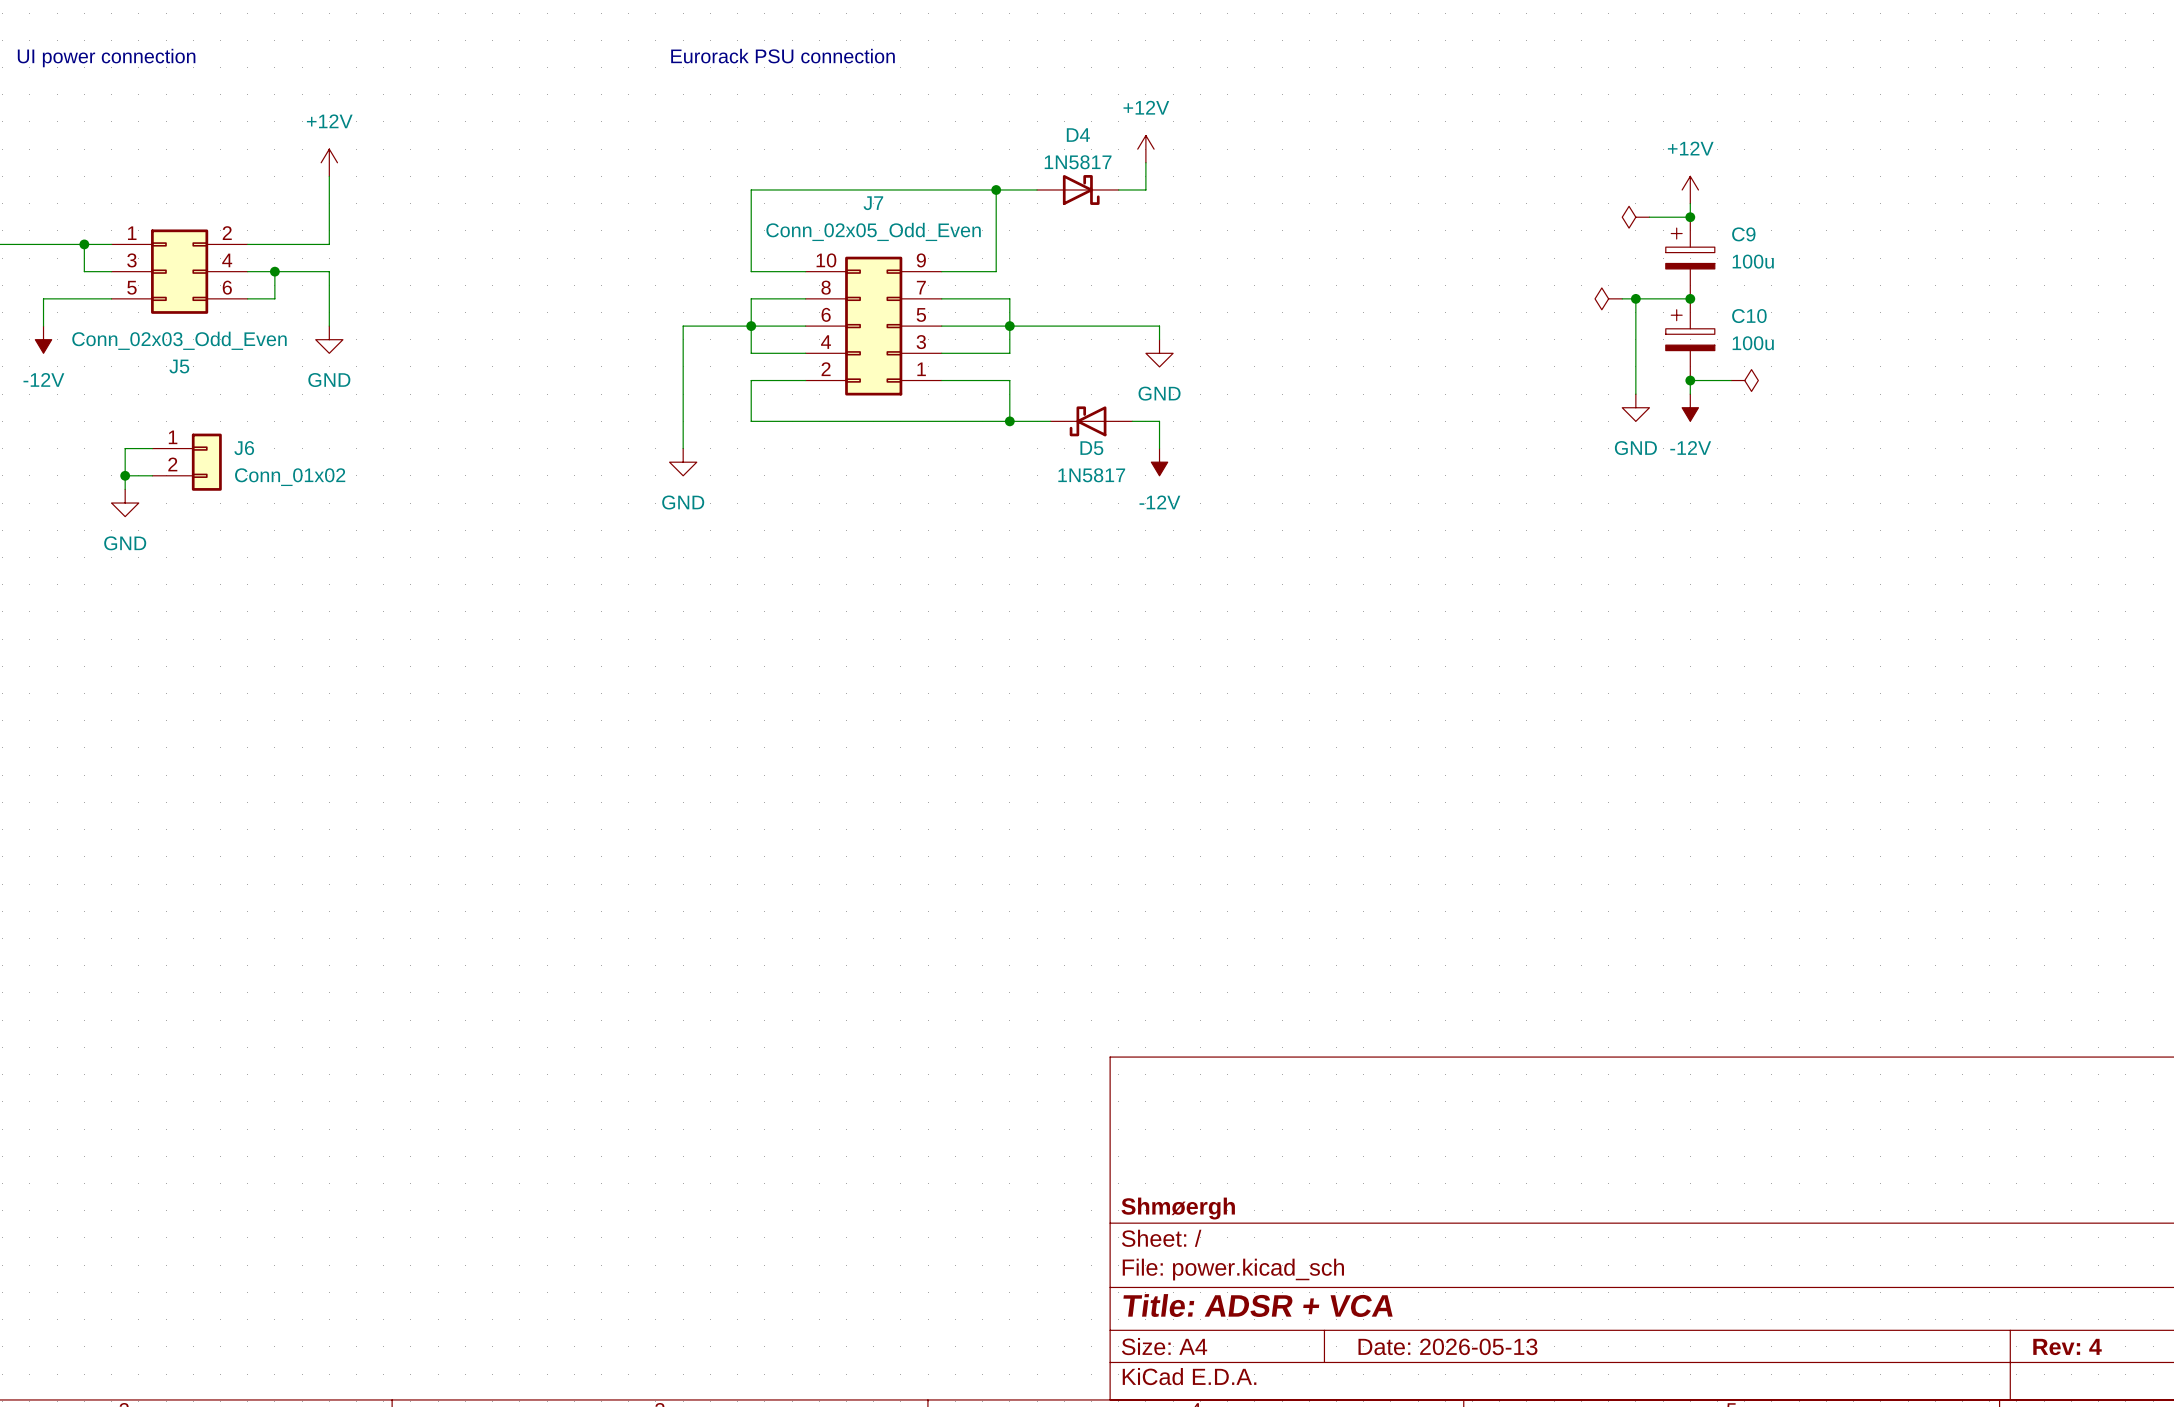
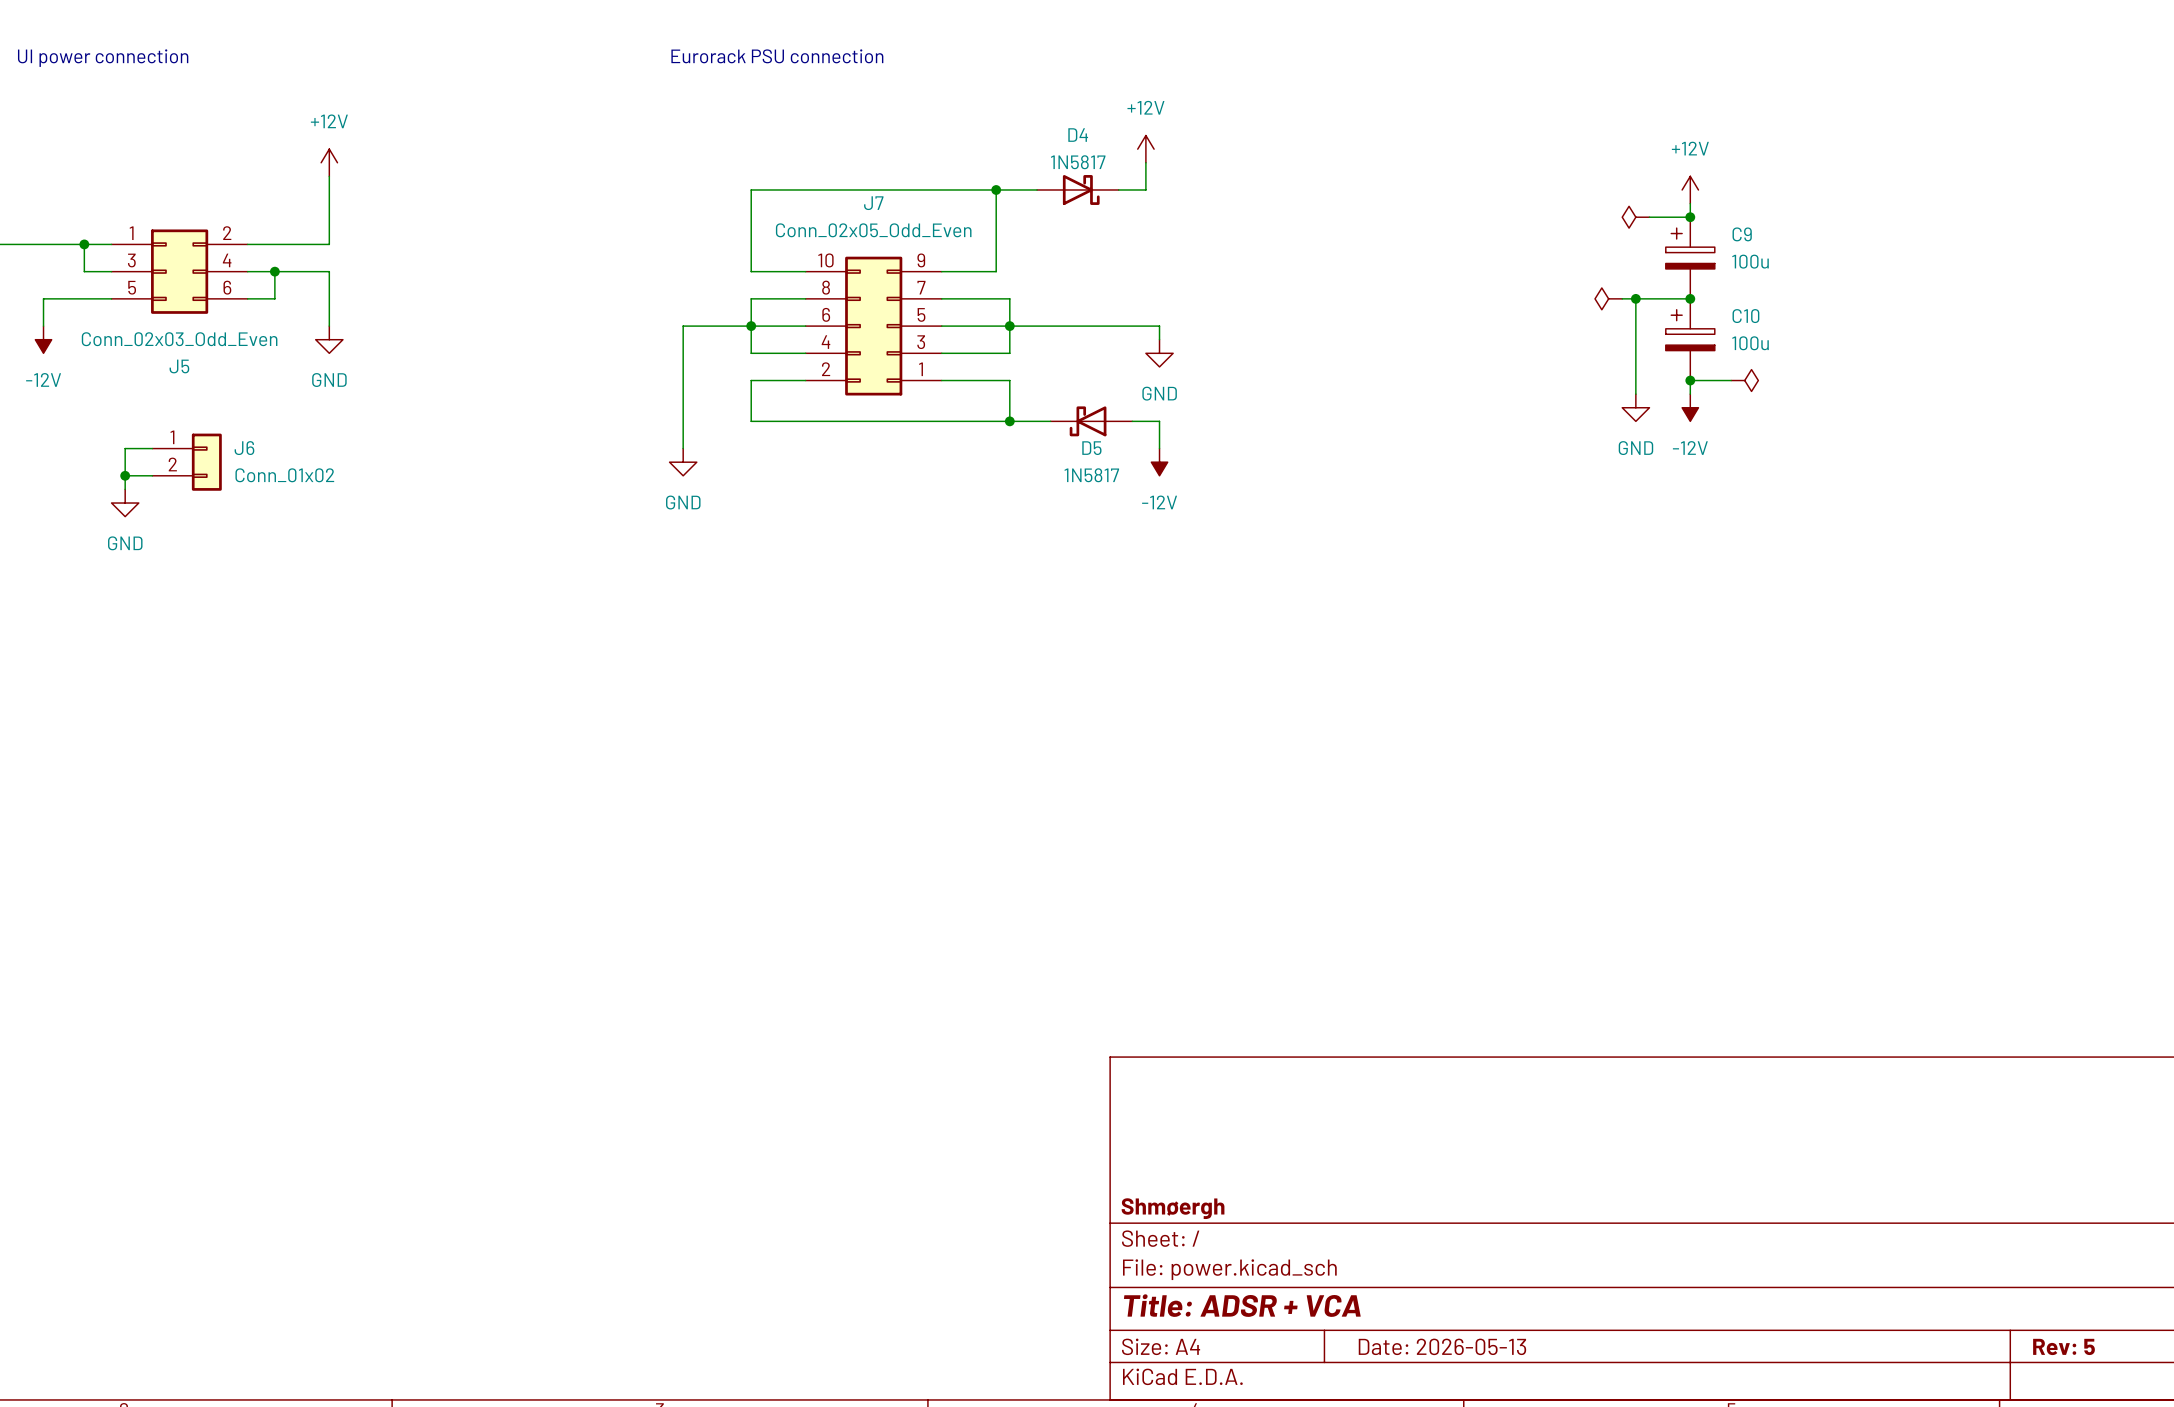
title block: Rev: 4 (2067, 1346) -> Rev: 5 (2064, 1346)

